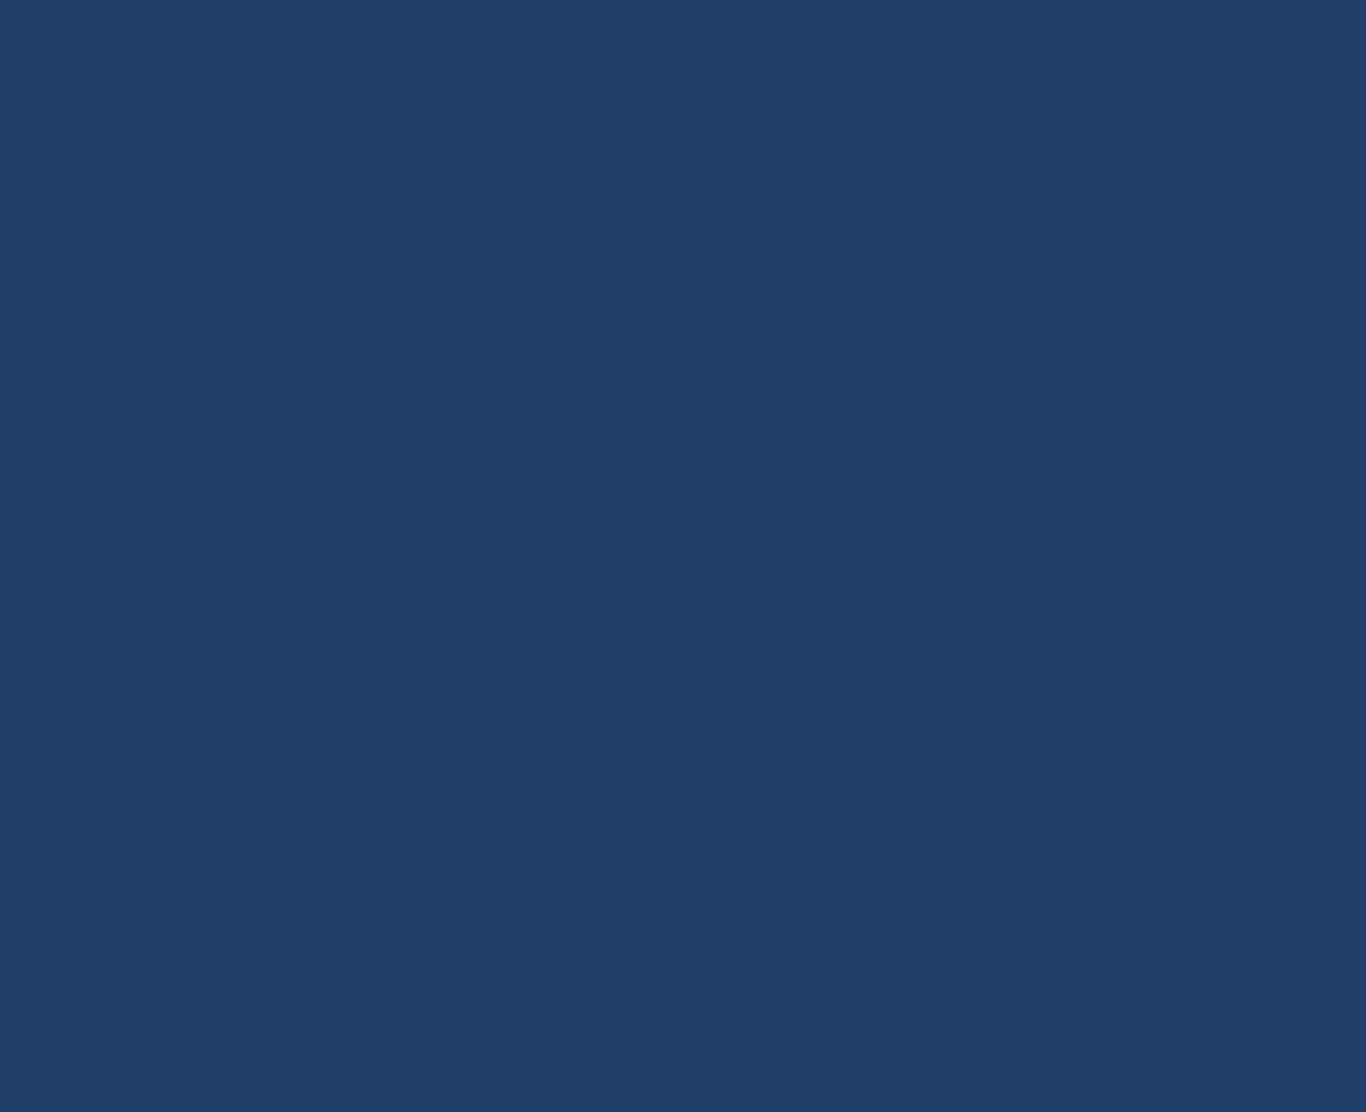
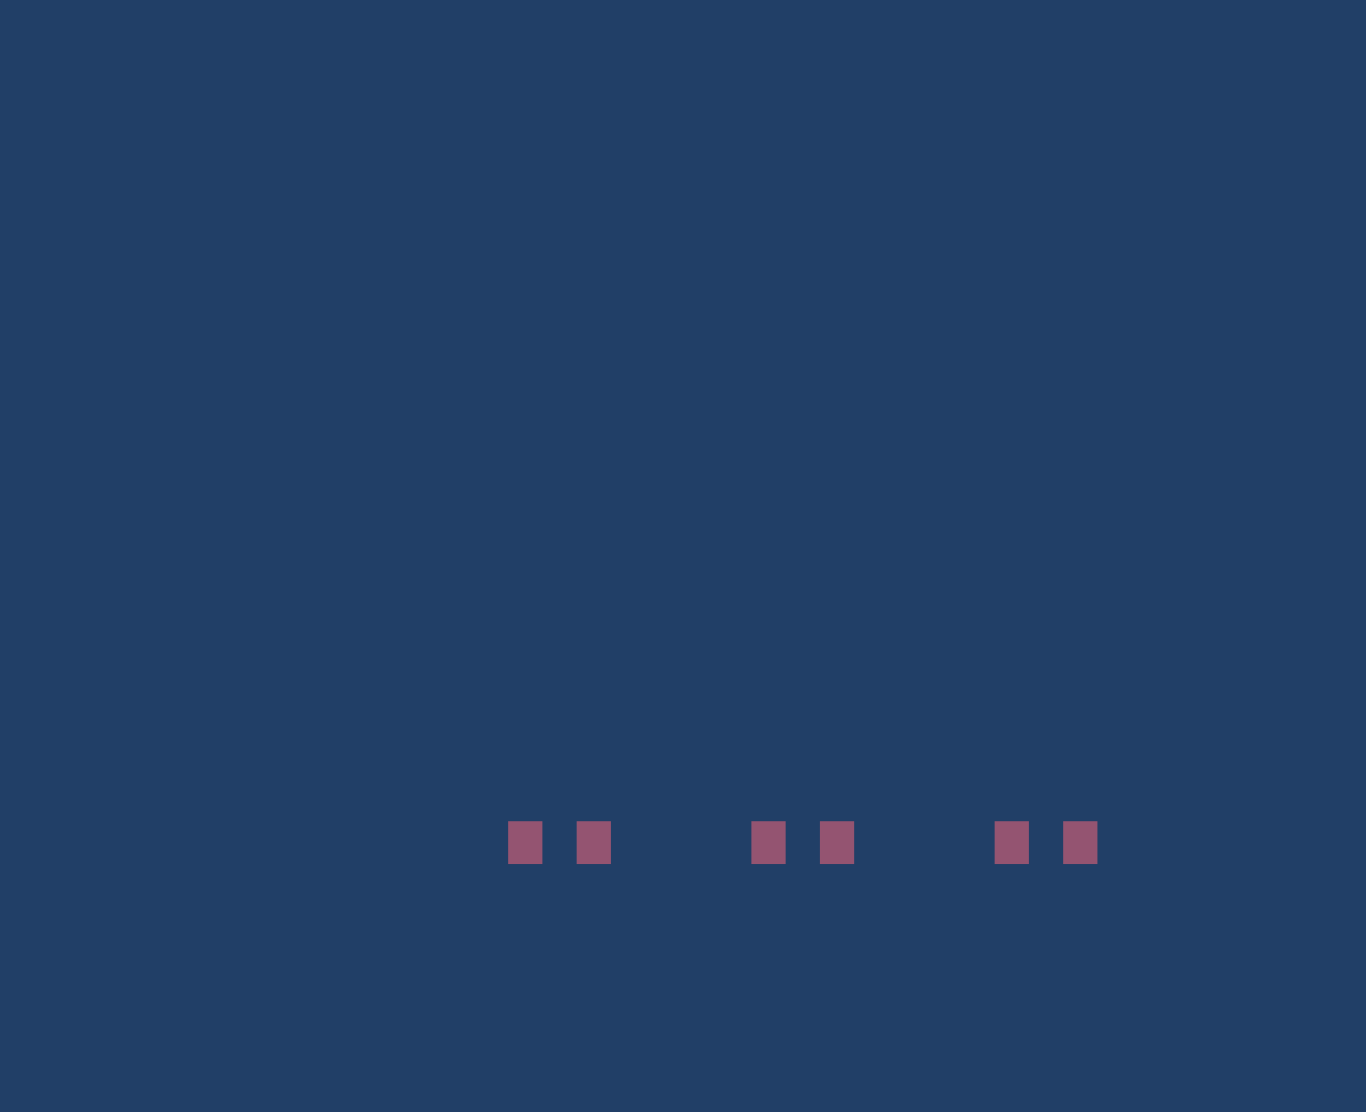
part: none -> (559, 842)
part: none -> (802, 842)
part: none -> (1046, 842)

